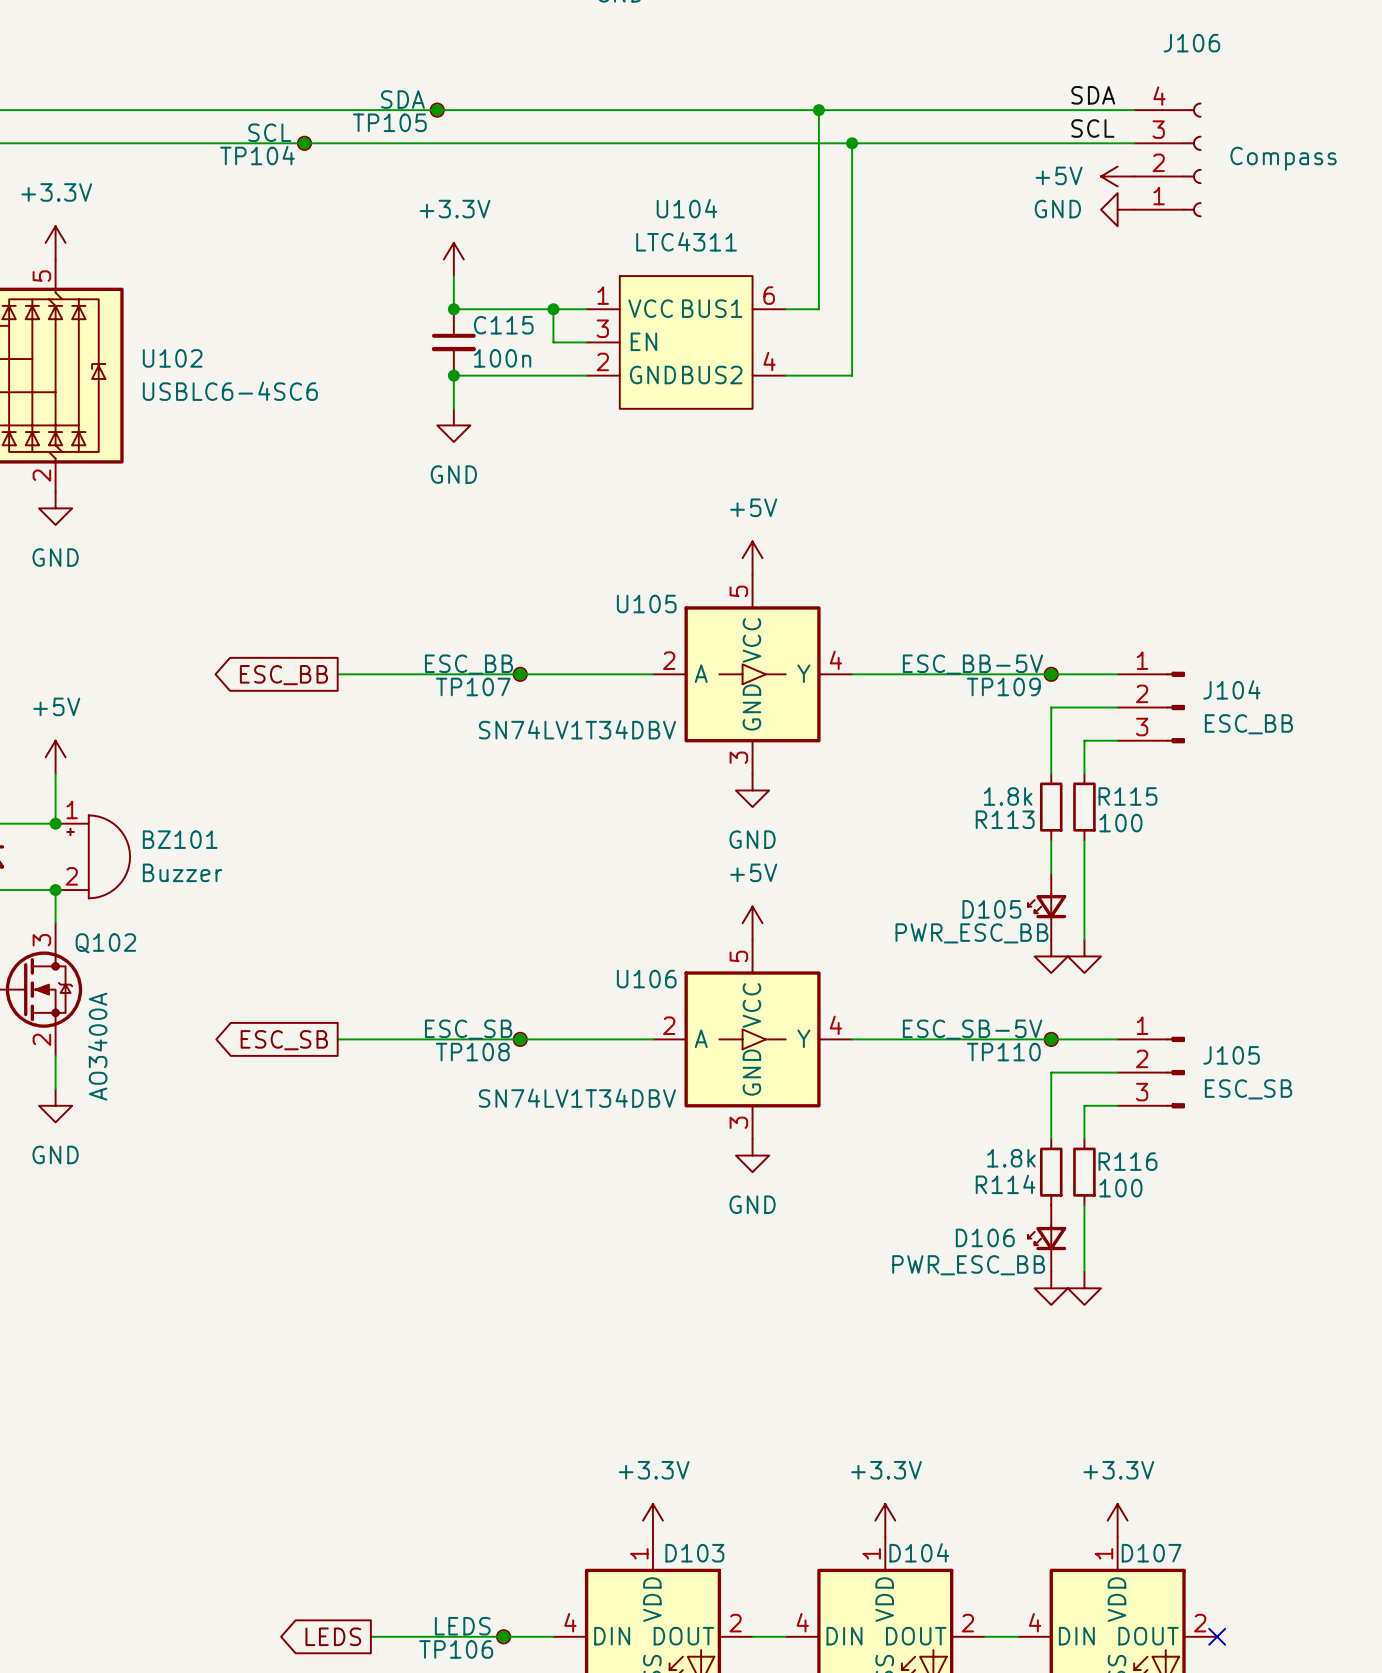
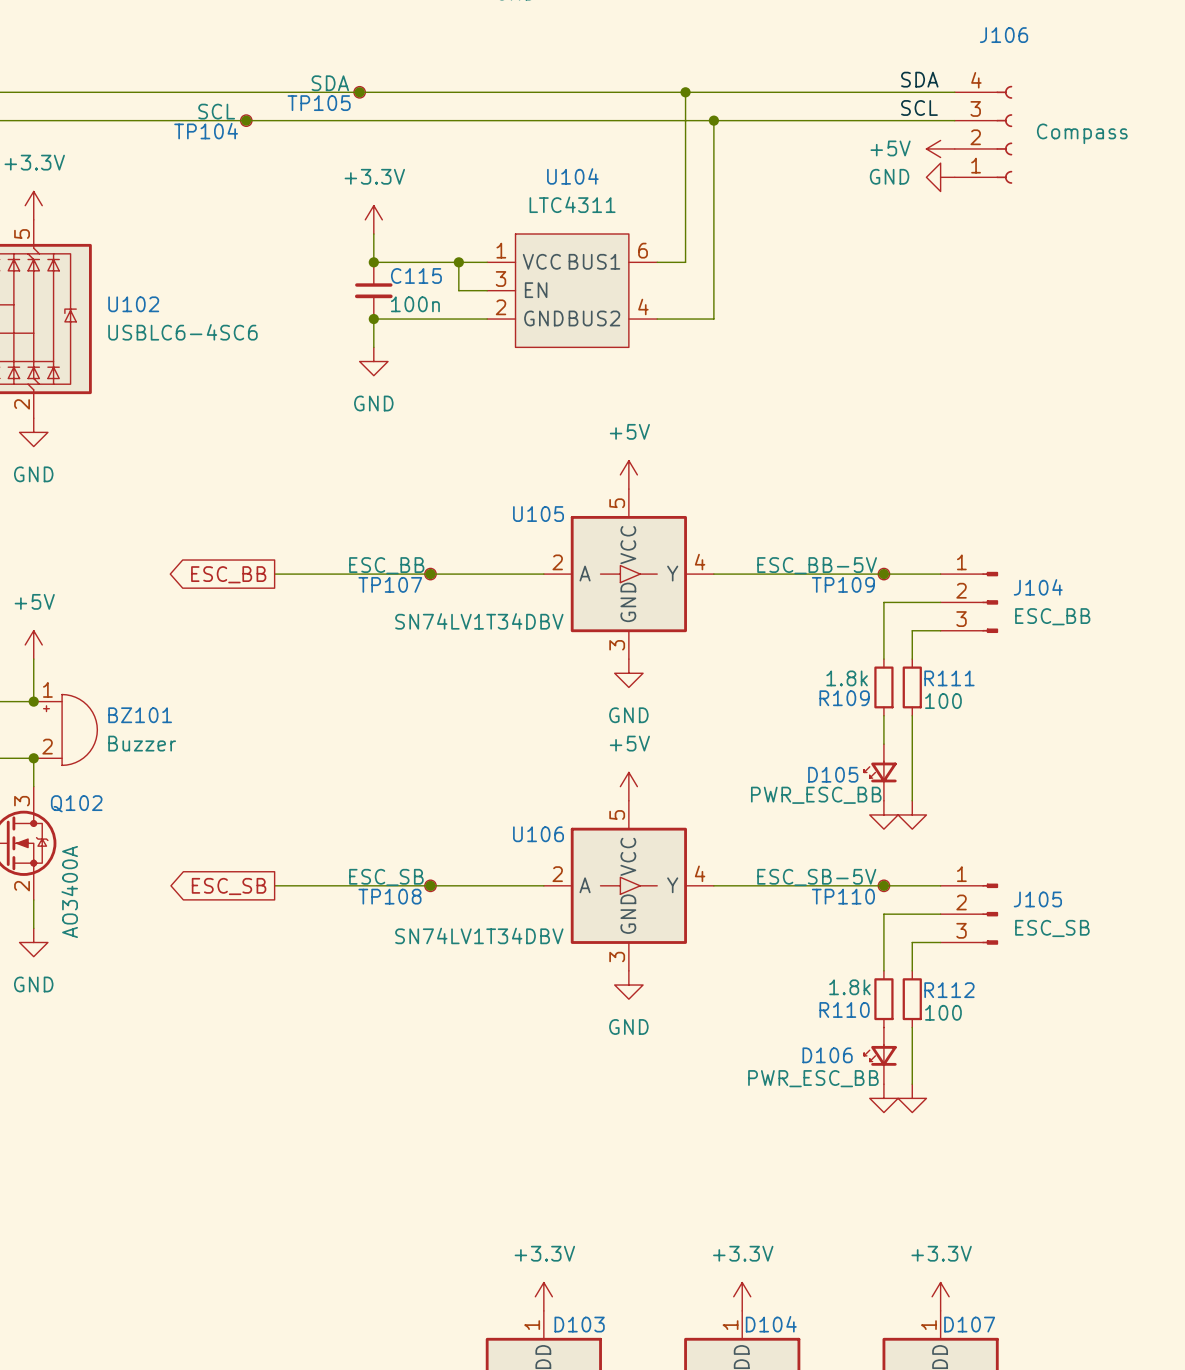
R115 name: R115 (1127, 796) -> R111 (949, 678)
R113 name: R113 (1005, 819) -> R109 (844, 698)
R116 name: R116 (1127, 1161) -> R112 (949, 990)
R114 name: R114 (1005, 1184) -> R110 (844, 1009)

